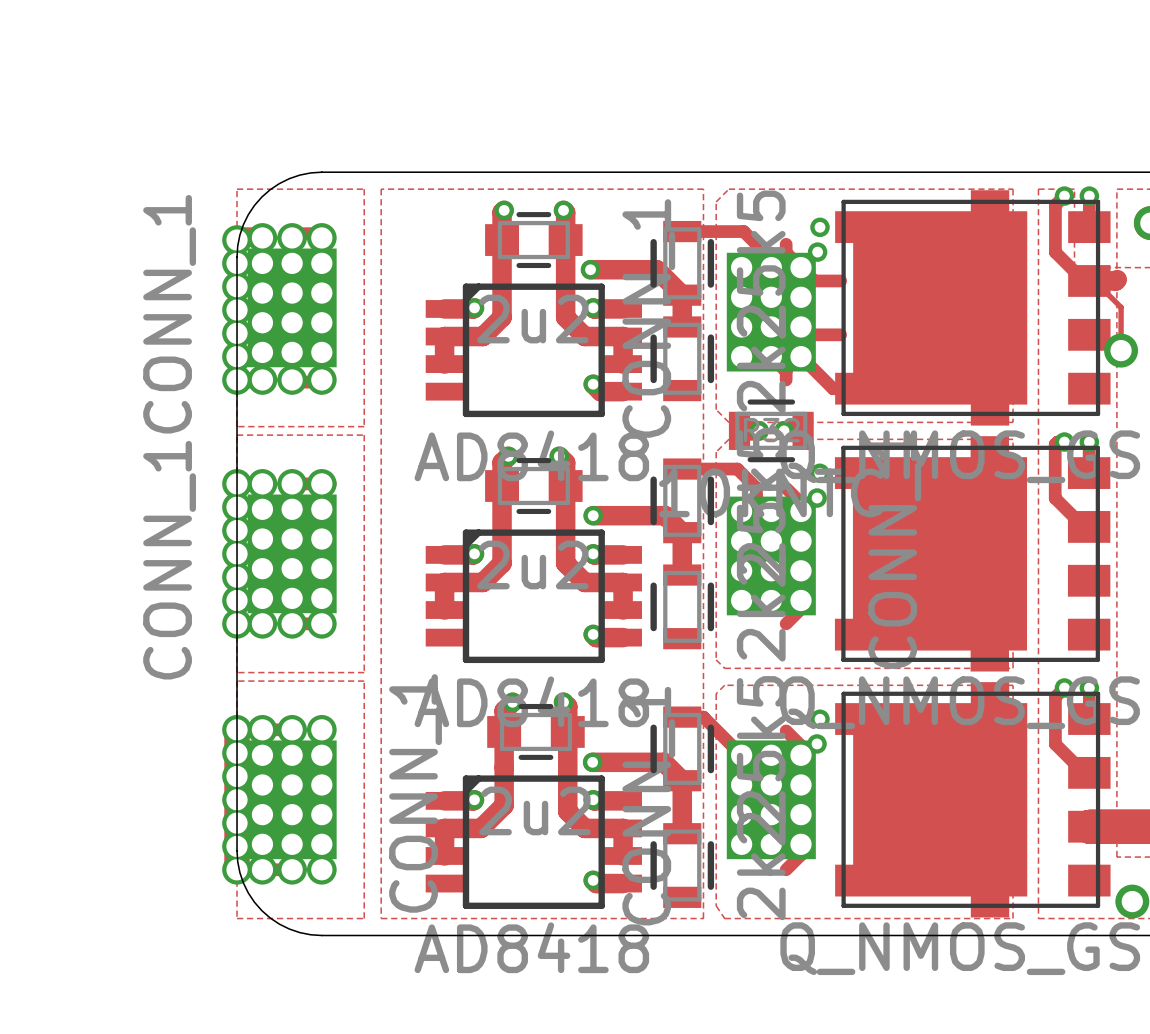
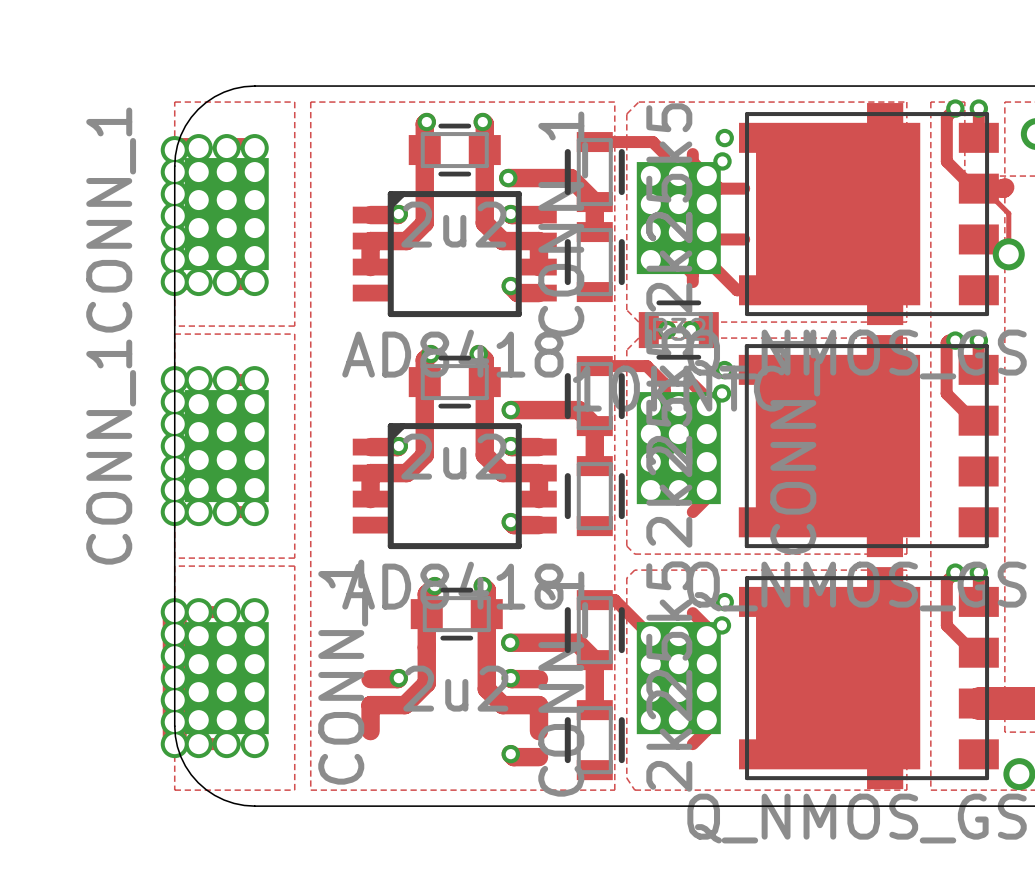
part: AD8418 (533, 842) -> none

